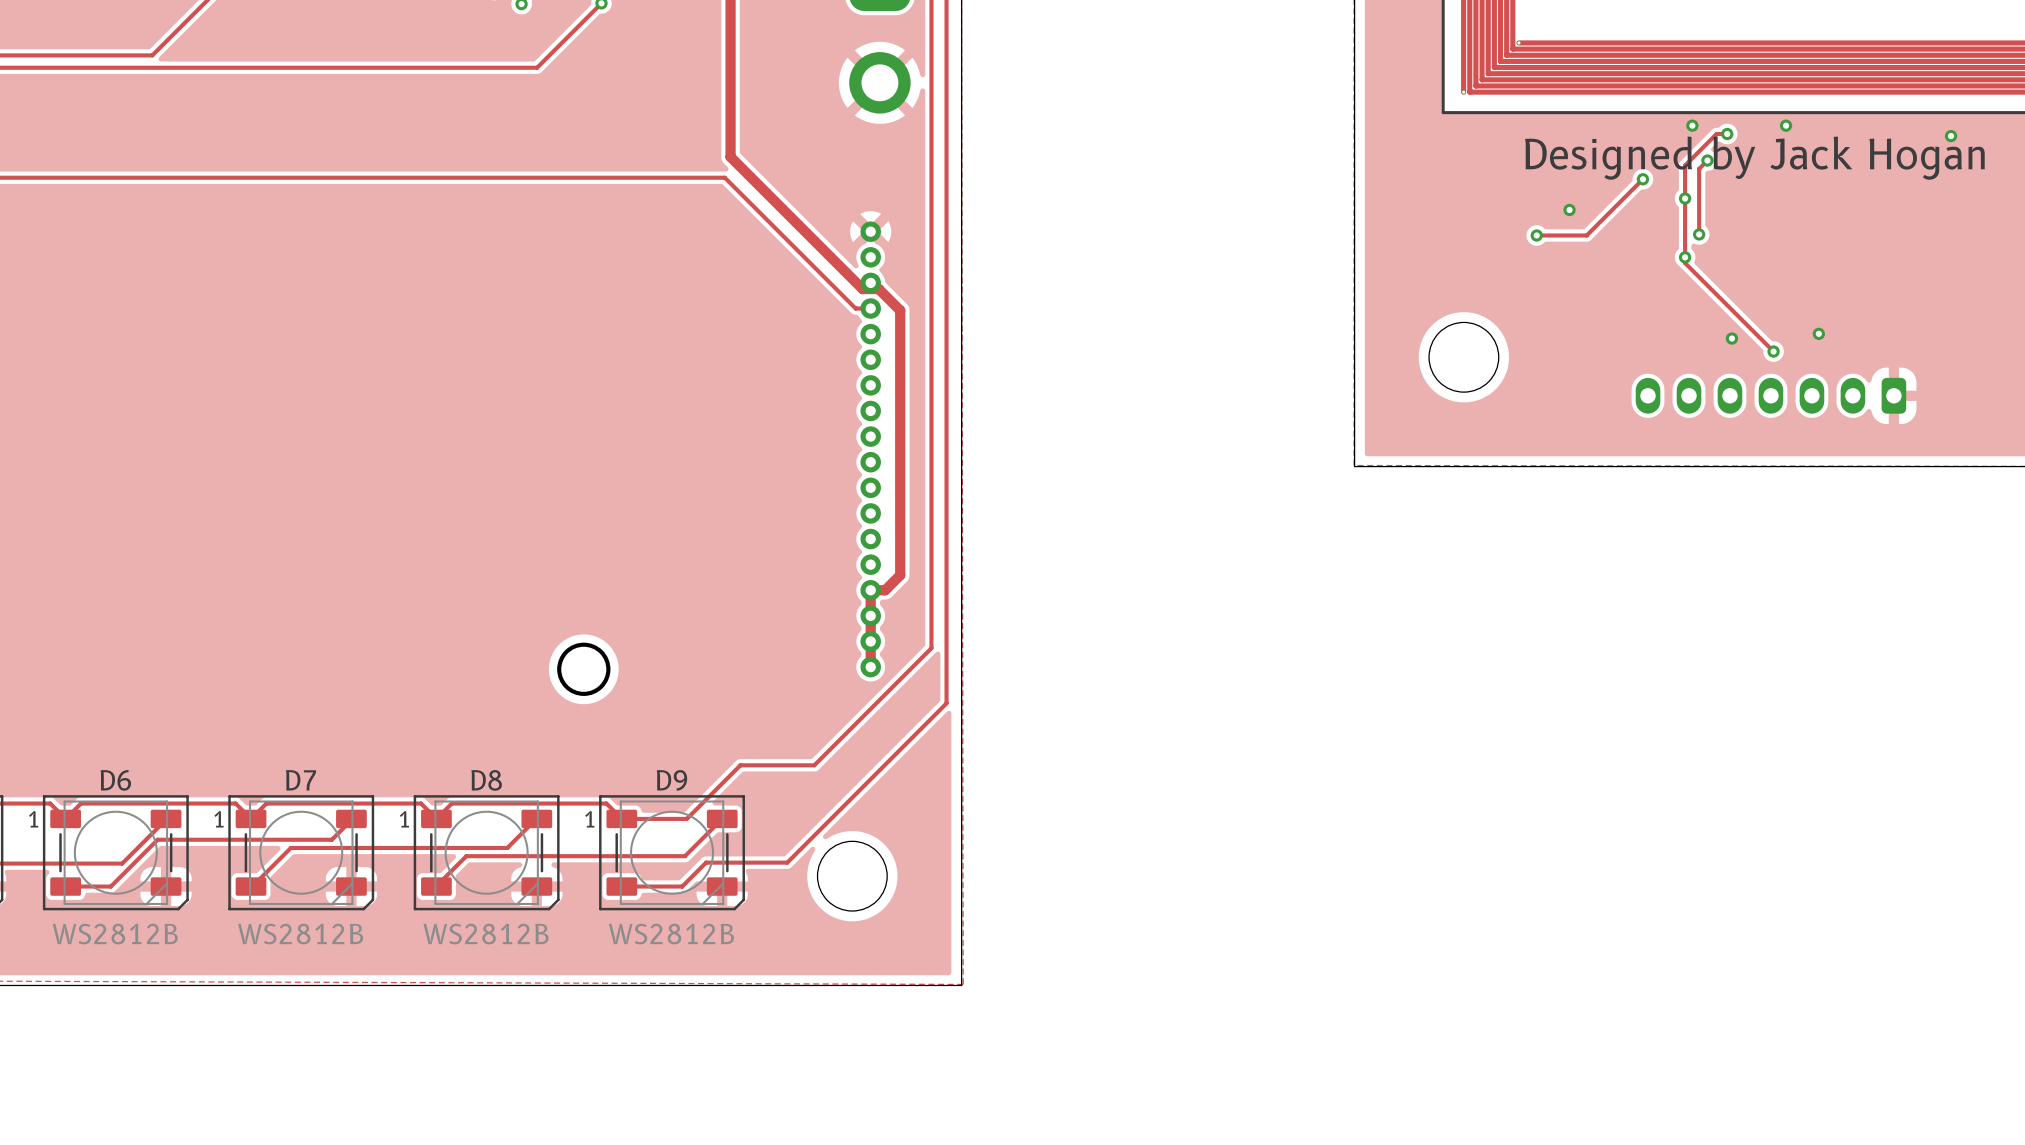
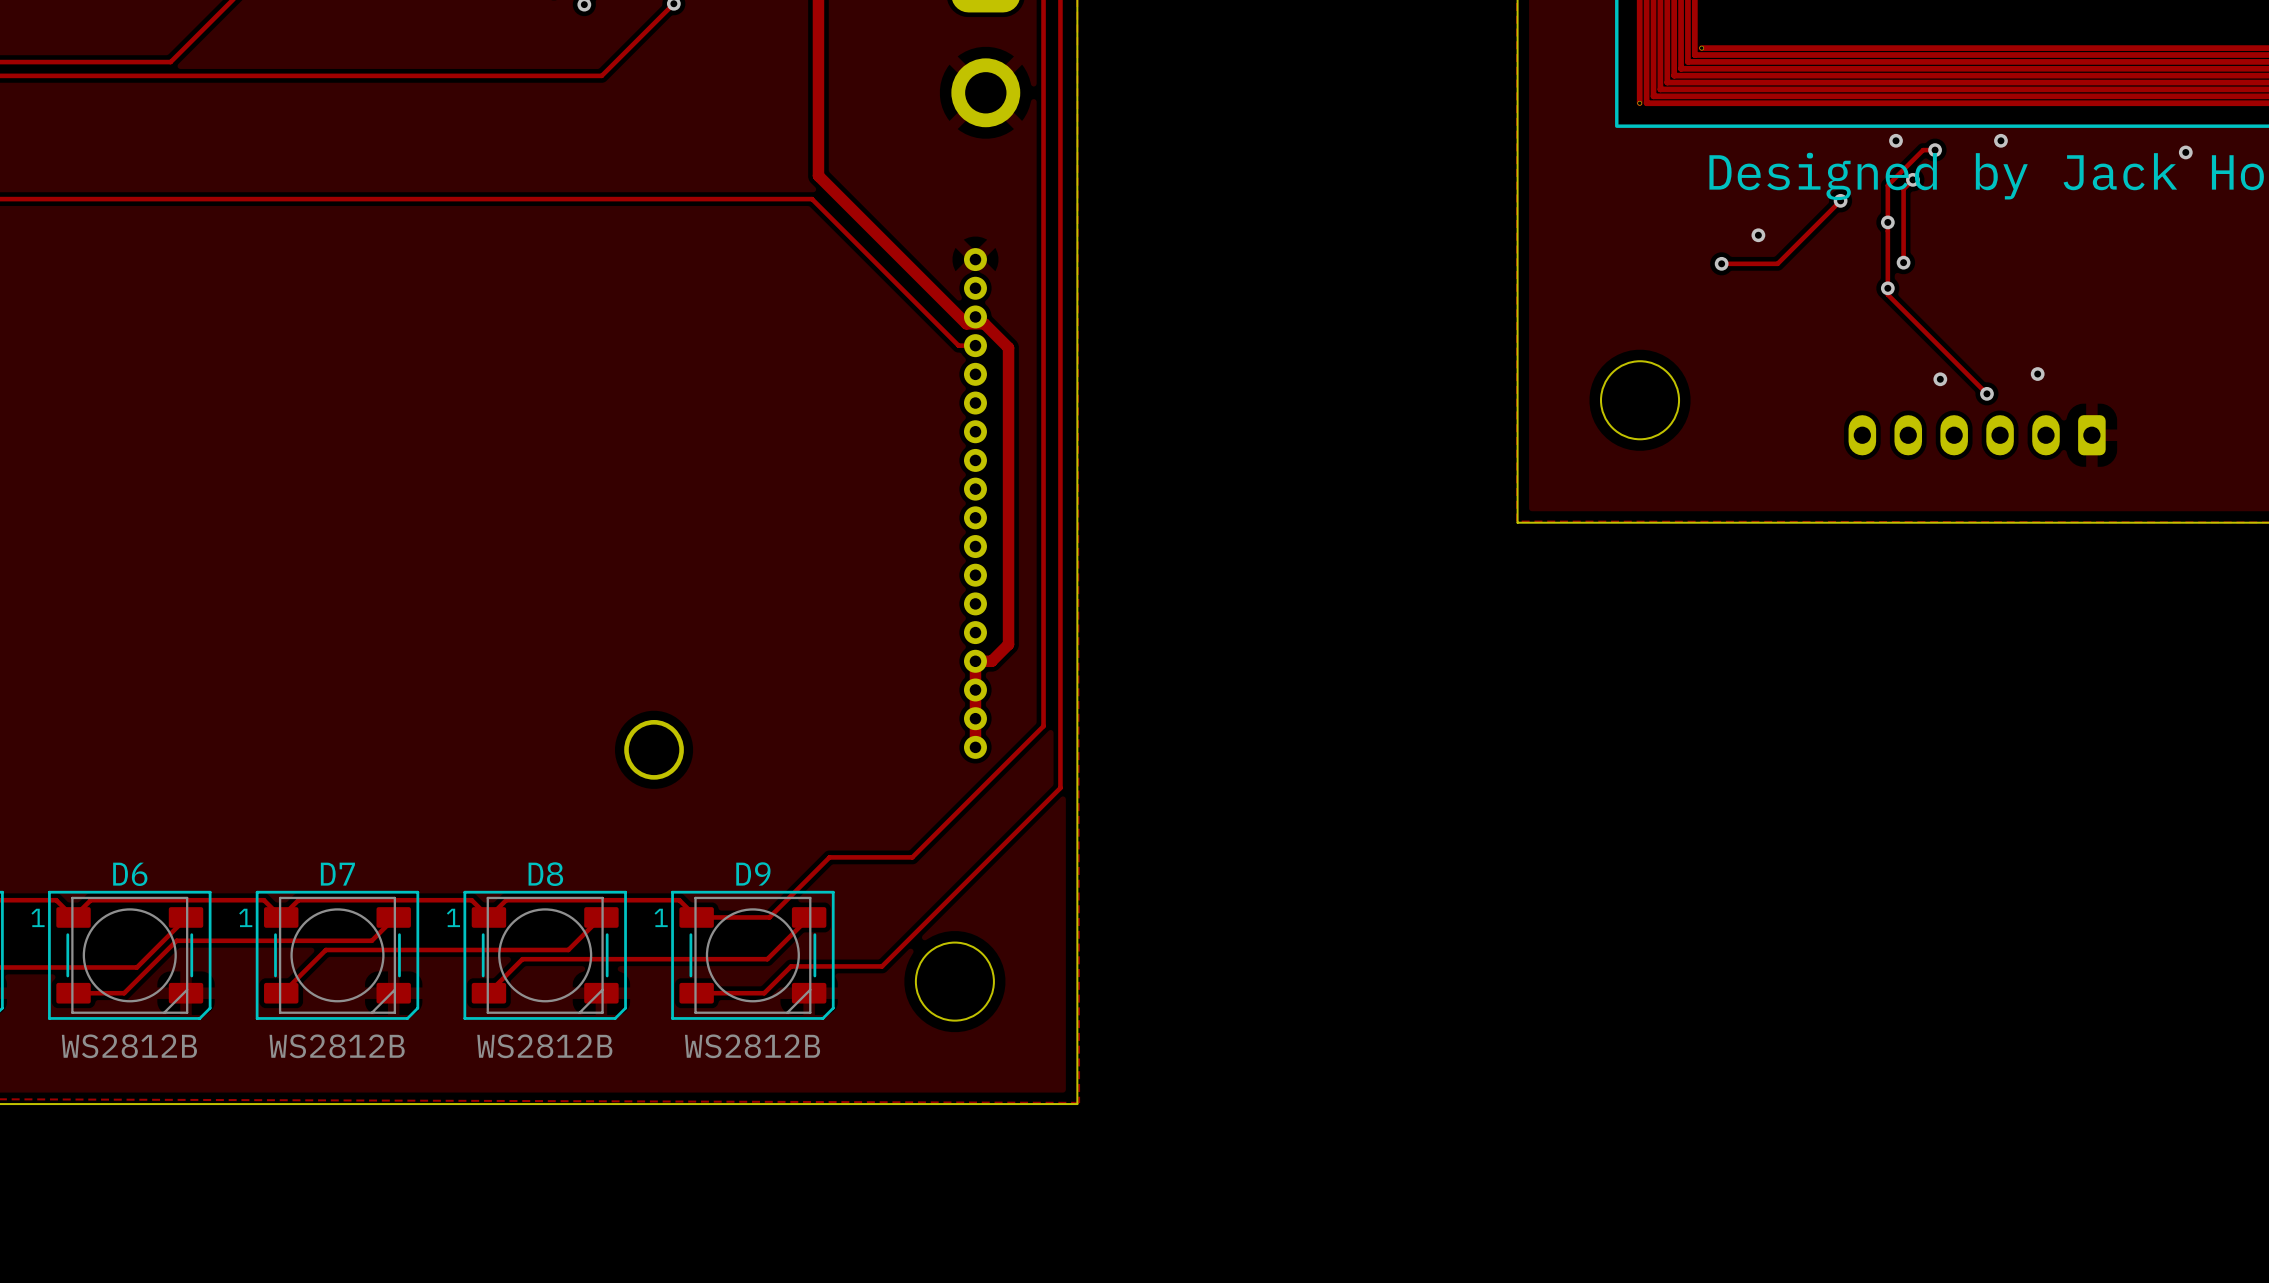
part footprint: [1635, 377, 1907, 414] -> [1848, 415, 2106, 456]

